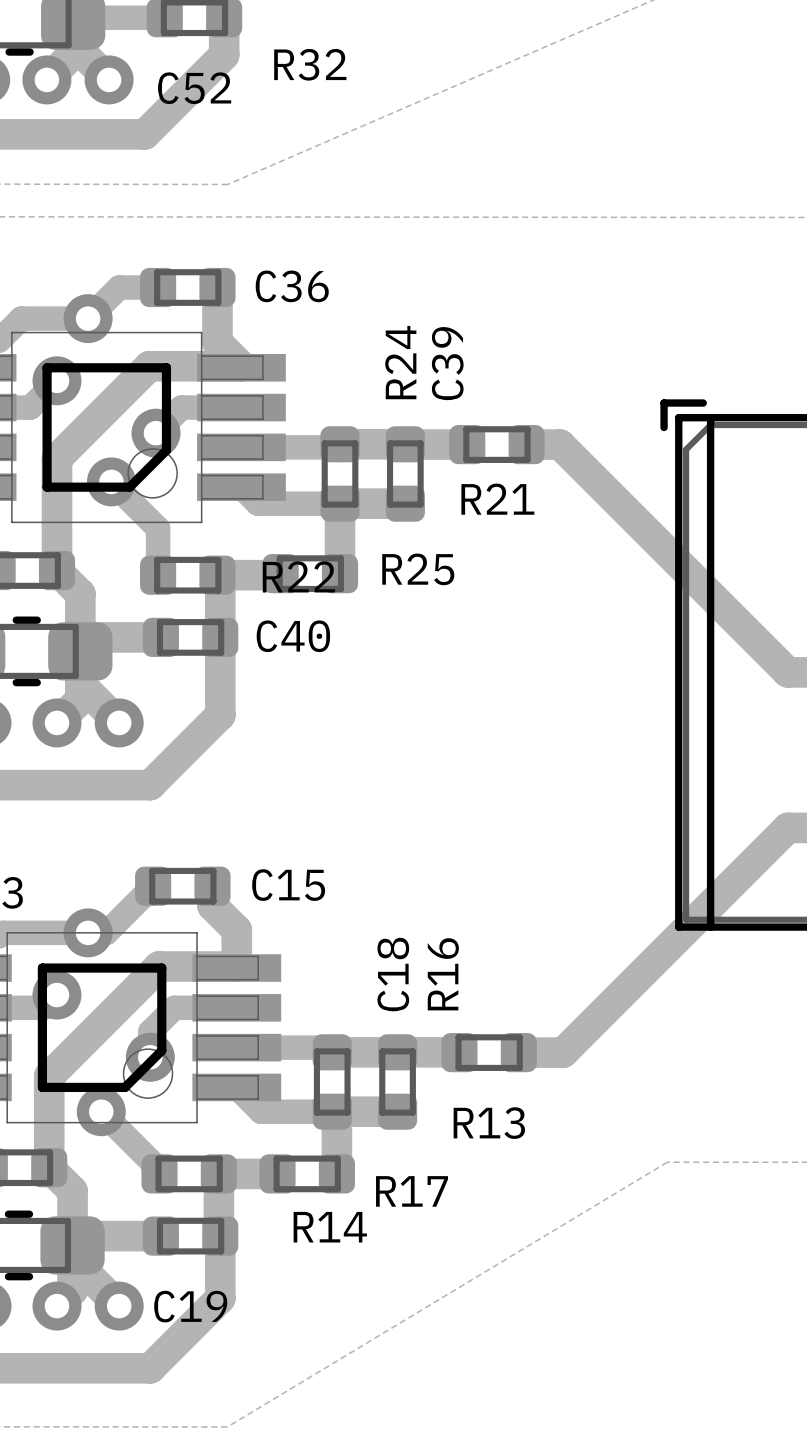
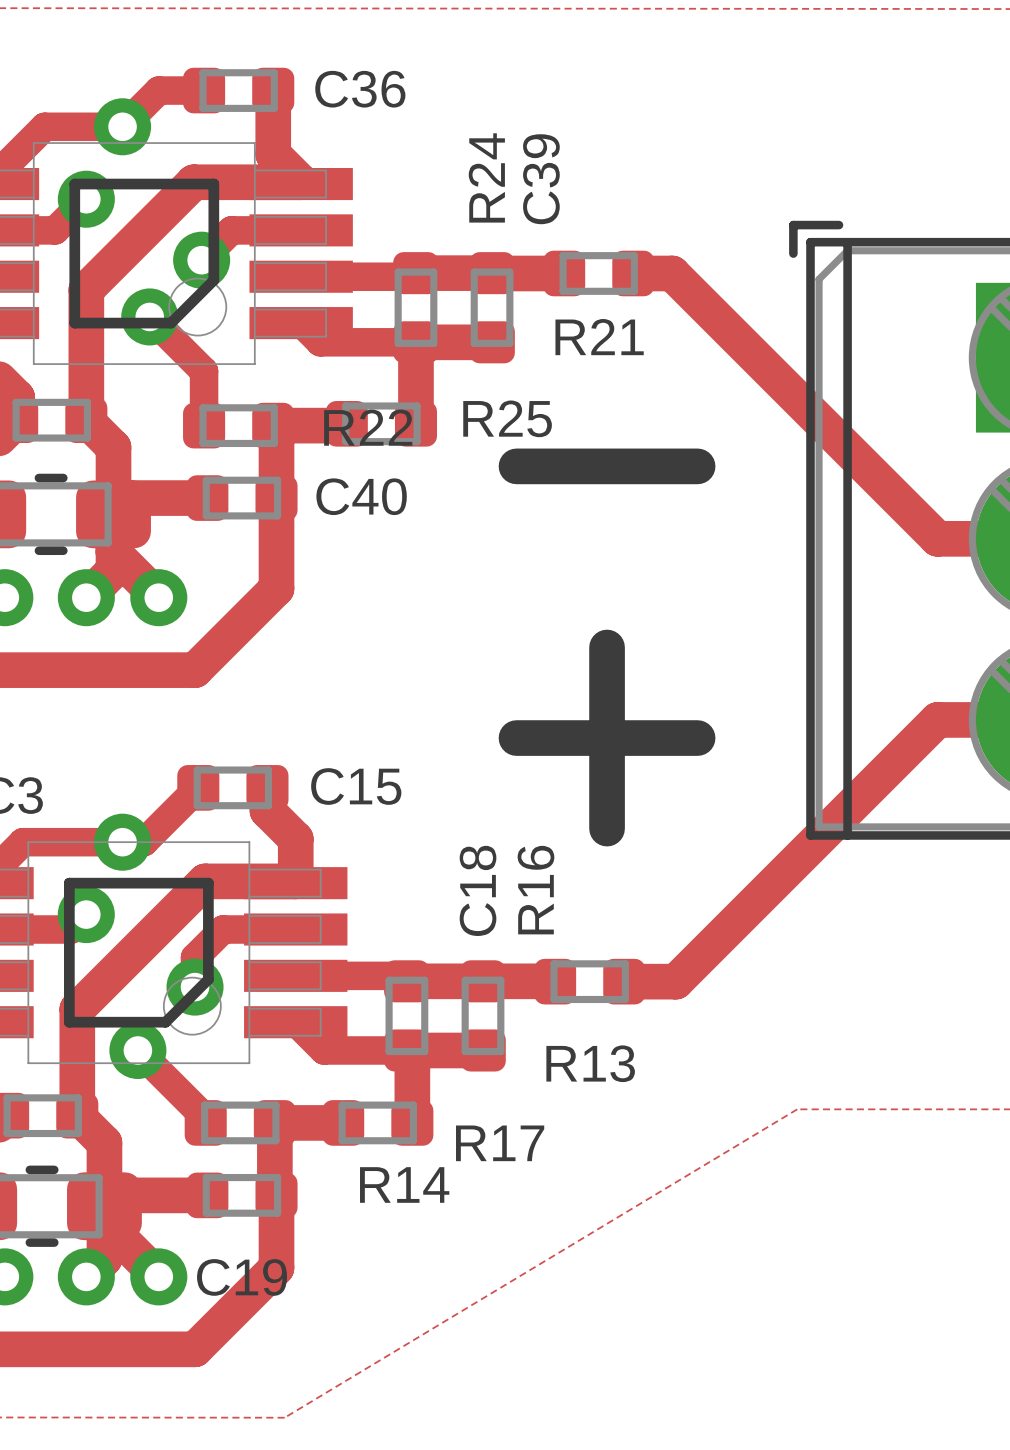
line: none -> (516, 466) (697, 466)
line: none -> (607, 647) (607, 828)
line: none -> (516, 738) (697, 738)

